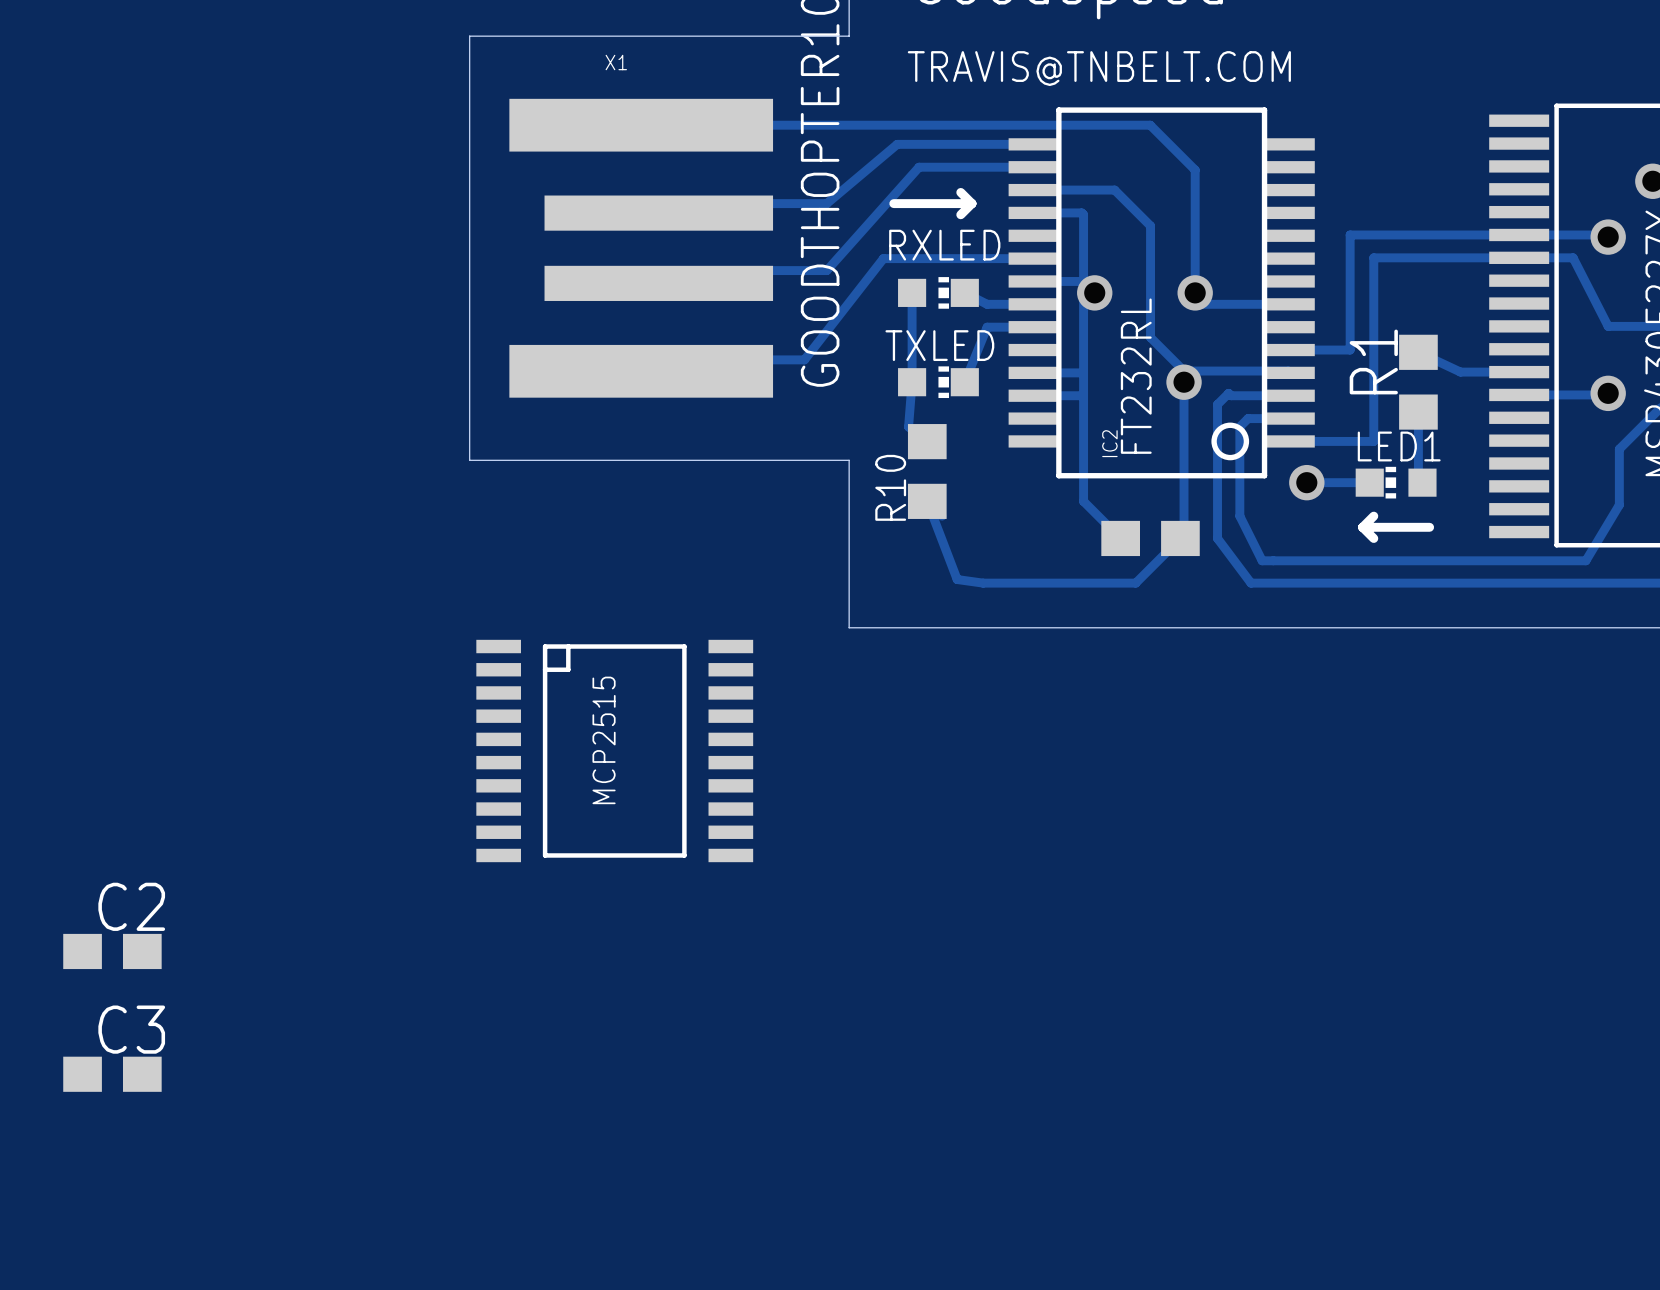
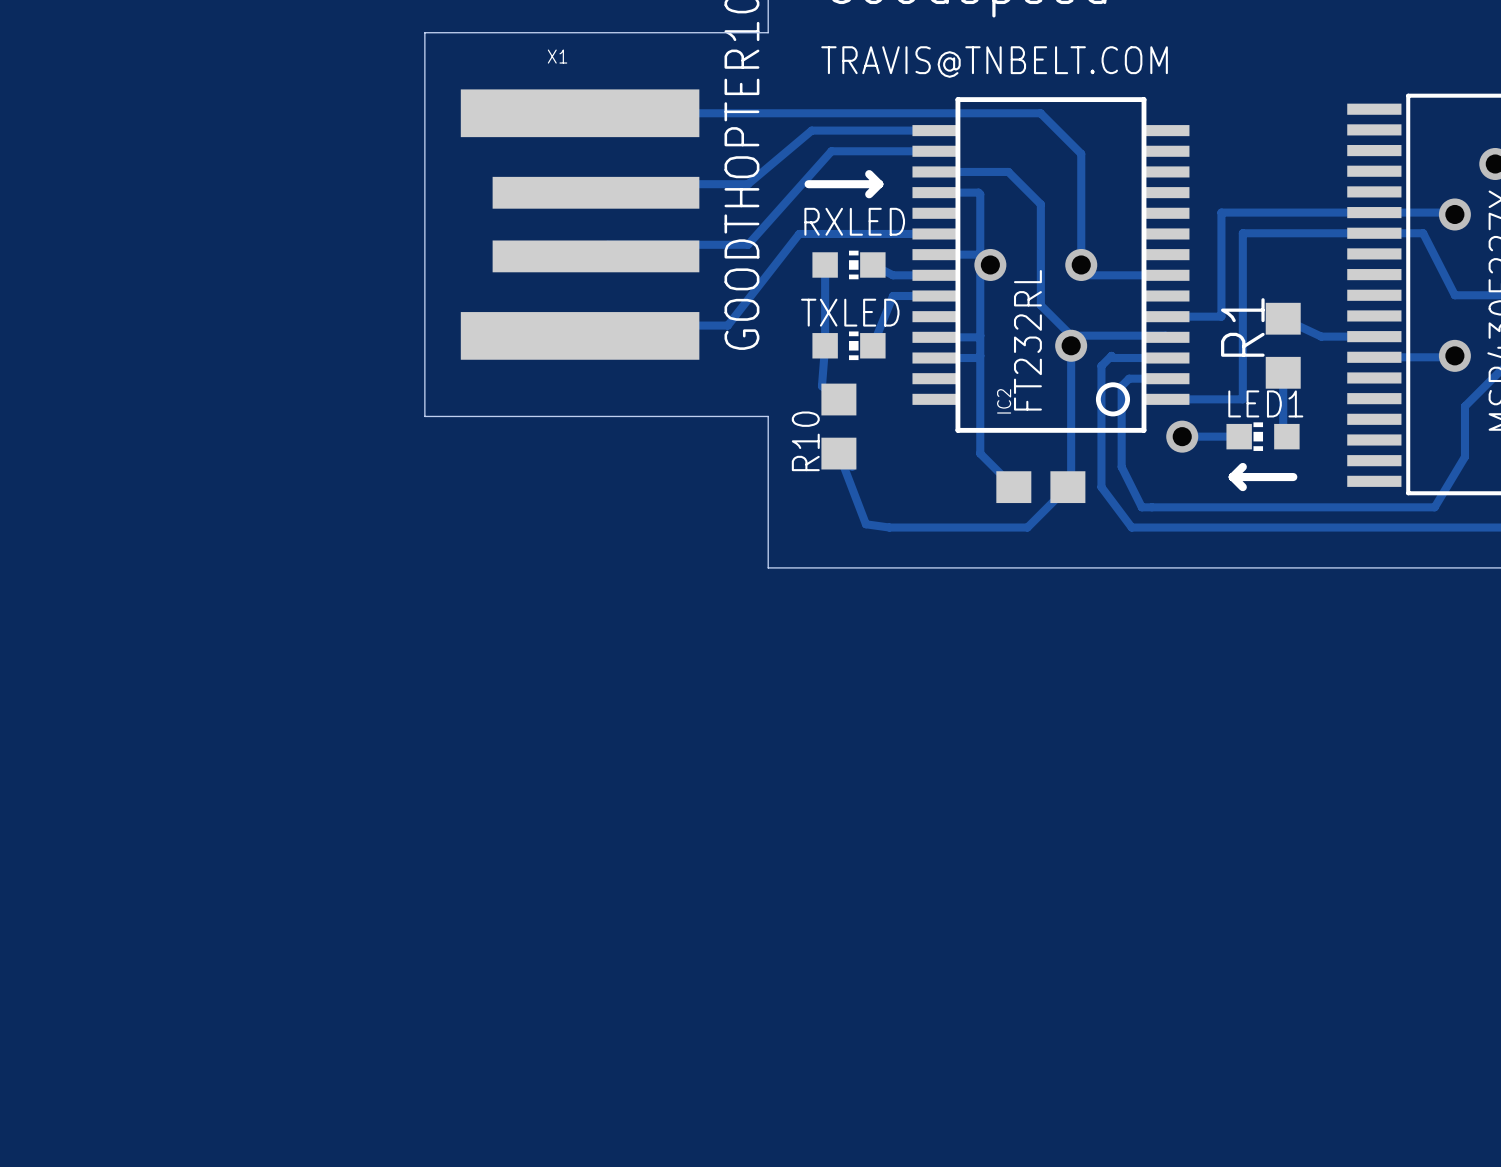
part: (614, 751) -> none
C2: (112, 951) -> none
C3: (112, 1074) -> none

